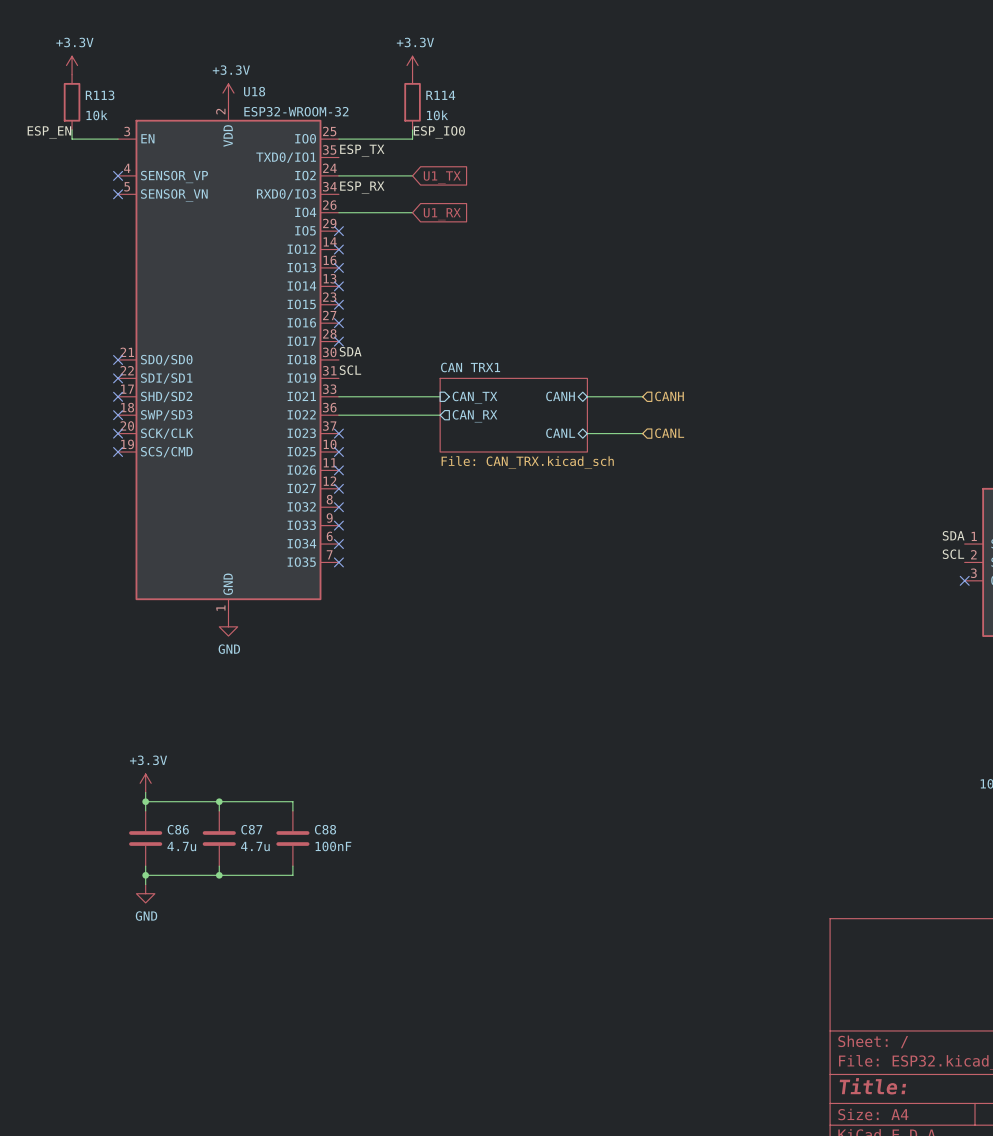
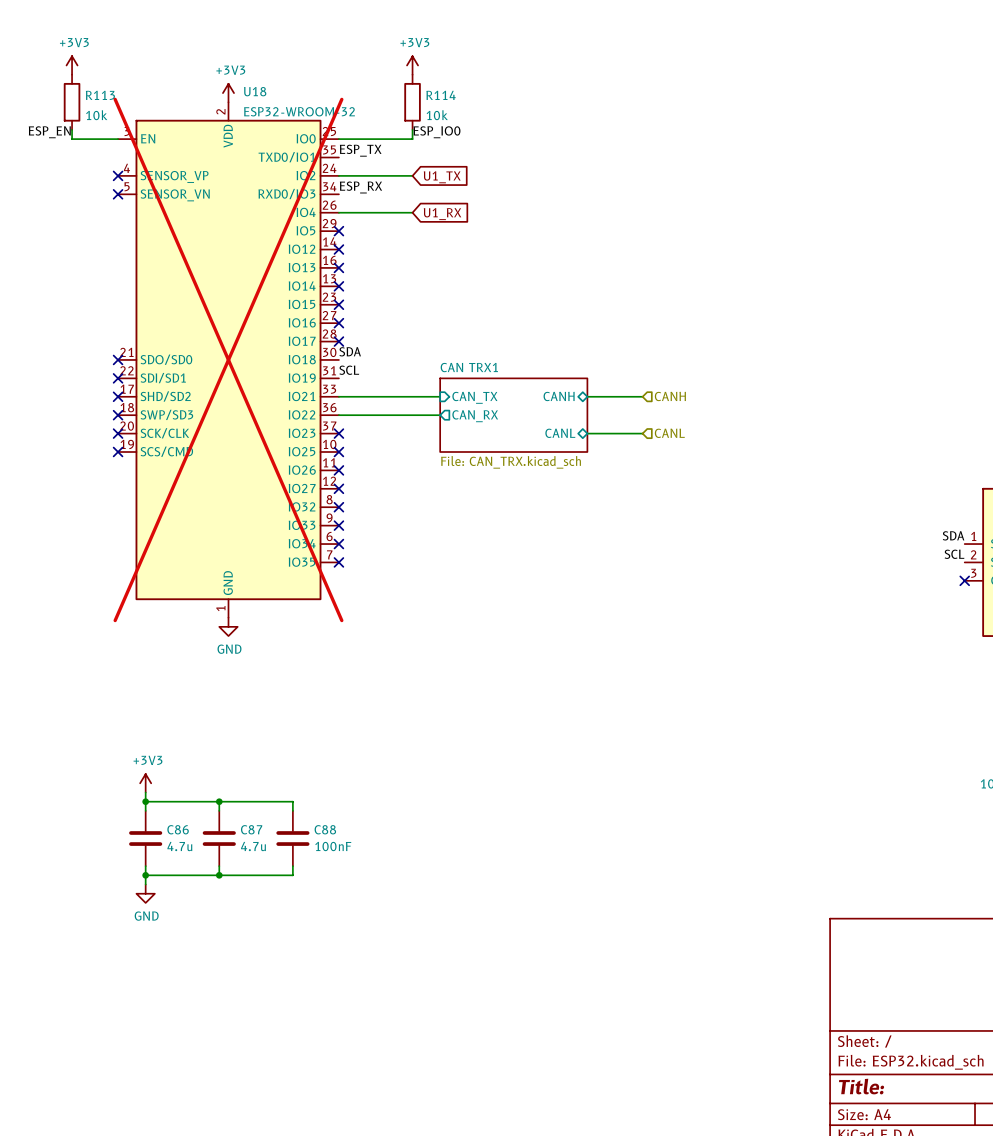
power symbol: +3.3V (72, 65) -> +3V3 (72, 65)
power symbol: +3.3V (412, 65) -> +3V3 (412, 65)
power symbol: +3.3V (228, 93) -> +3V3 (228, 93)
U18 do-not-place cross: none -> (228, 359)
power symbol: +3.3V (145, 783) -> +3V3 (145, 783)

